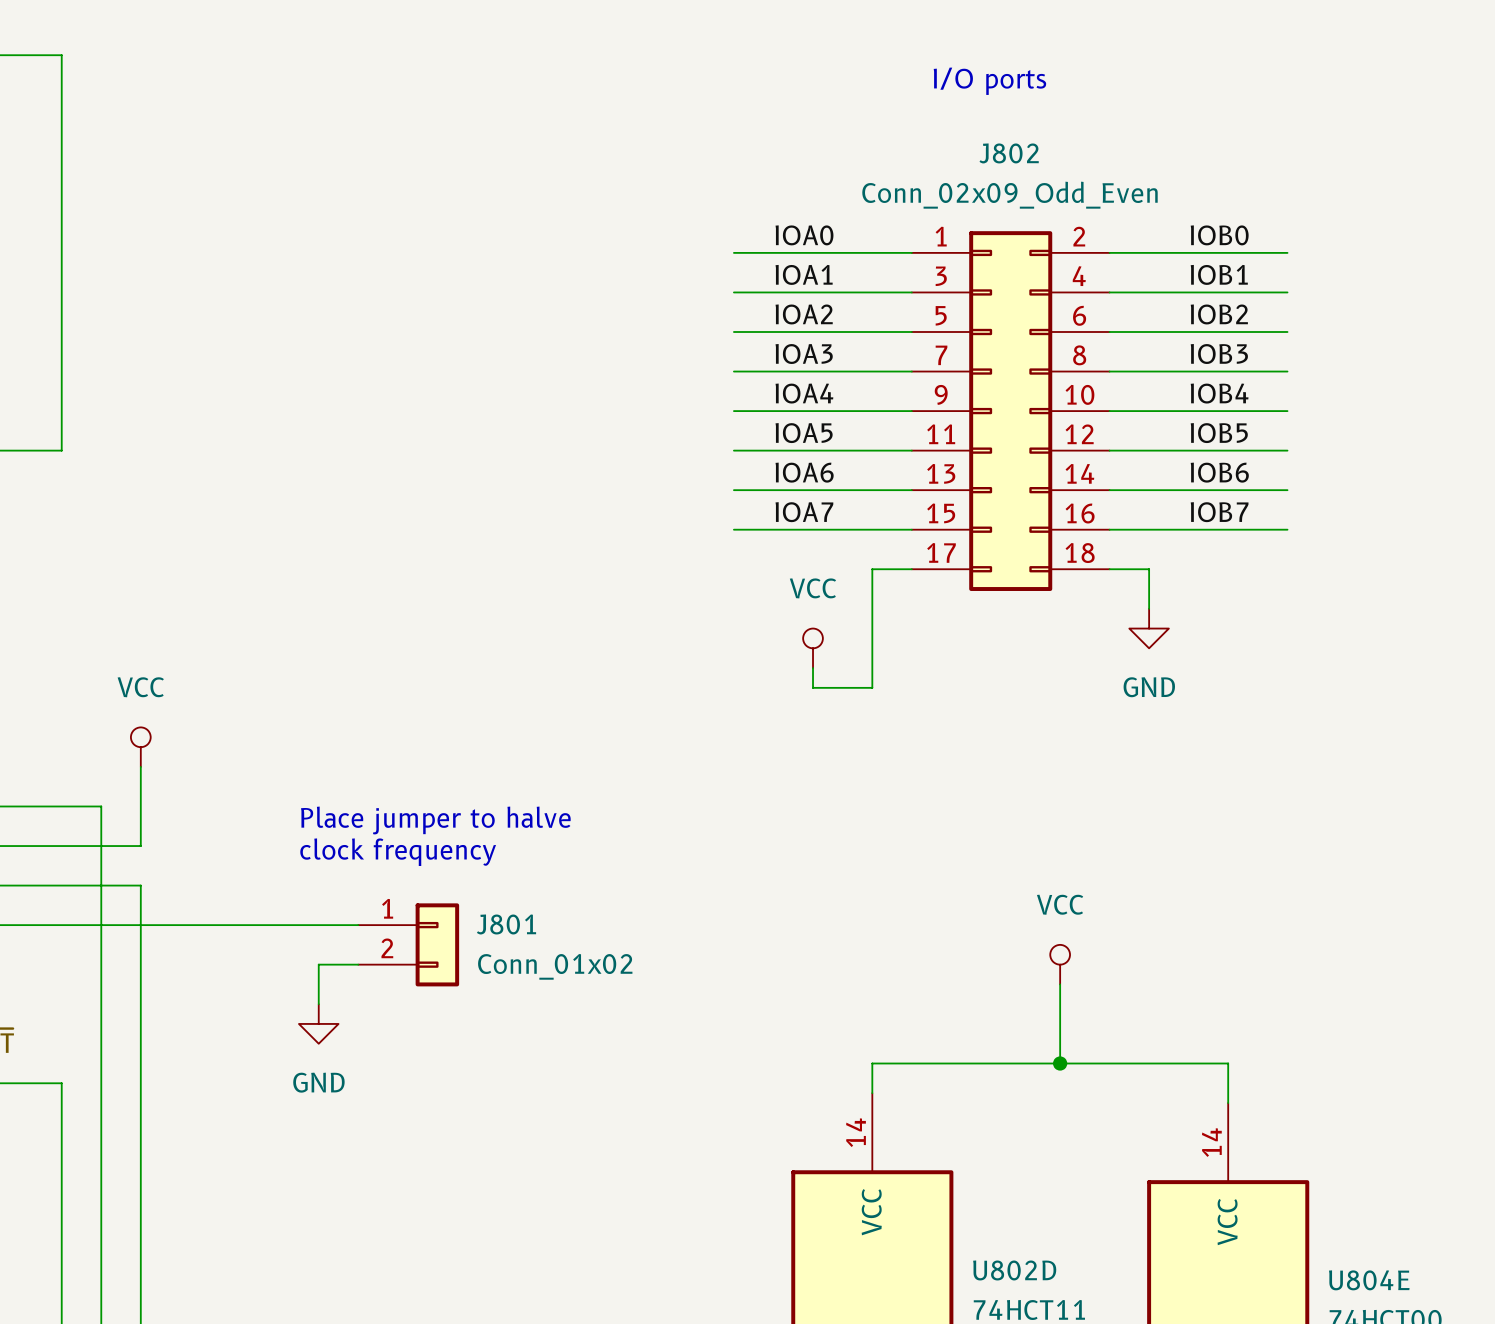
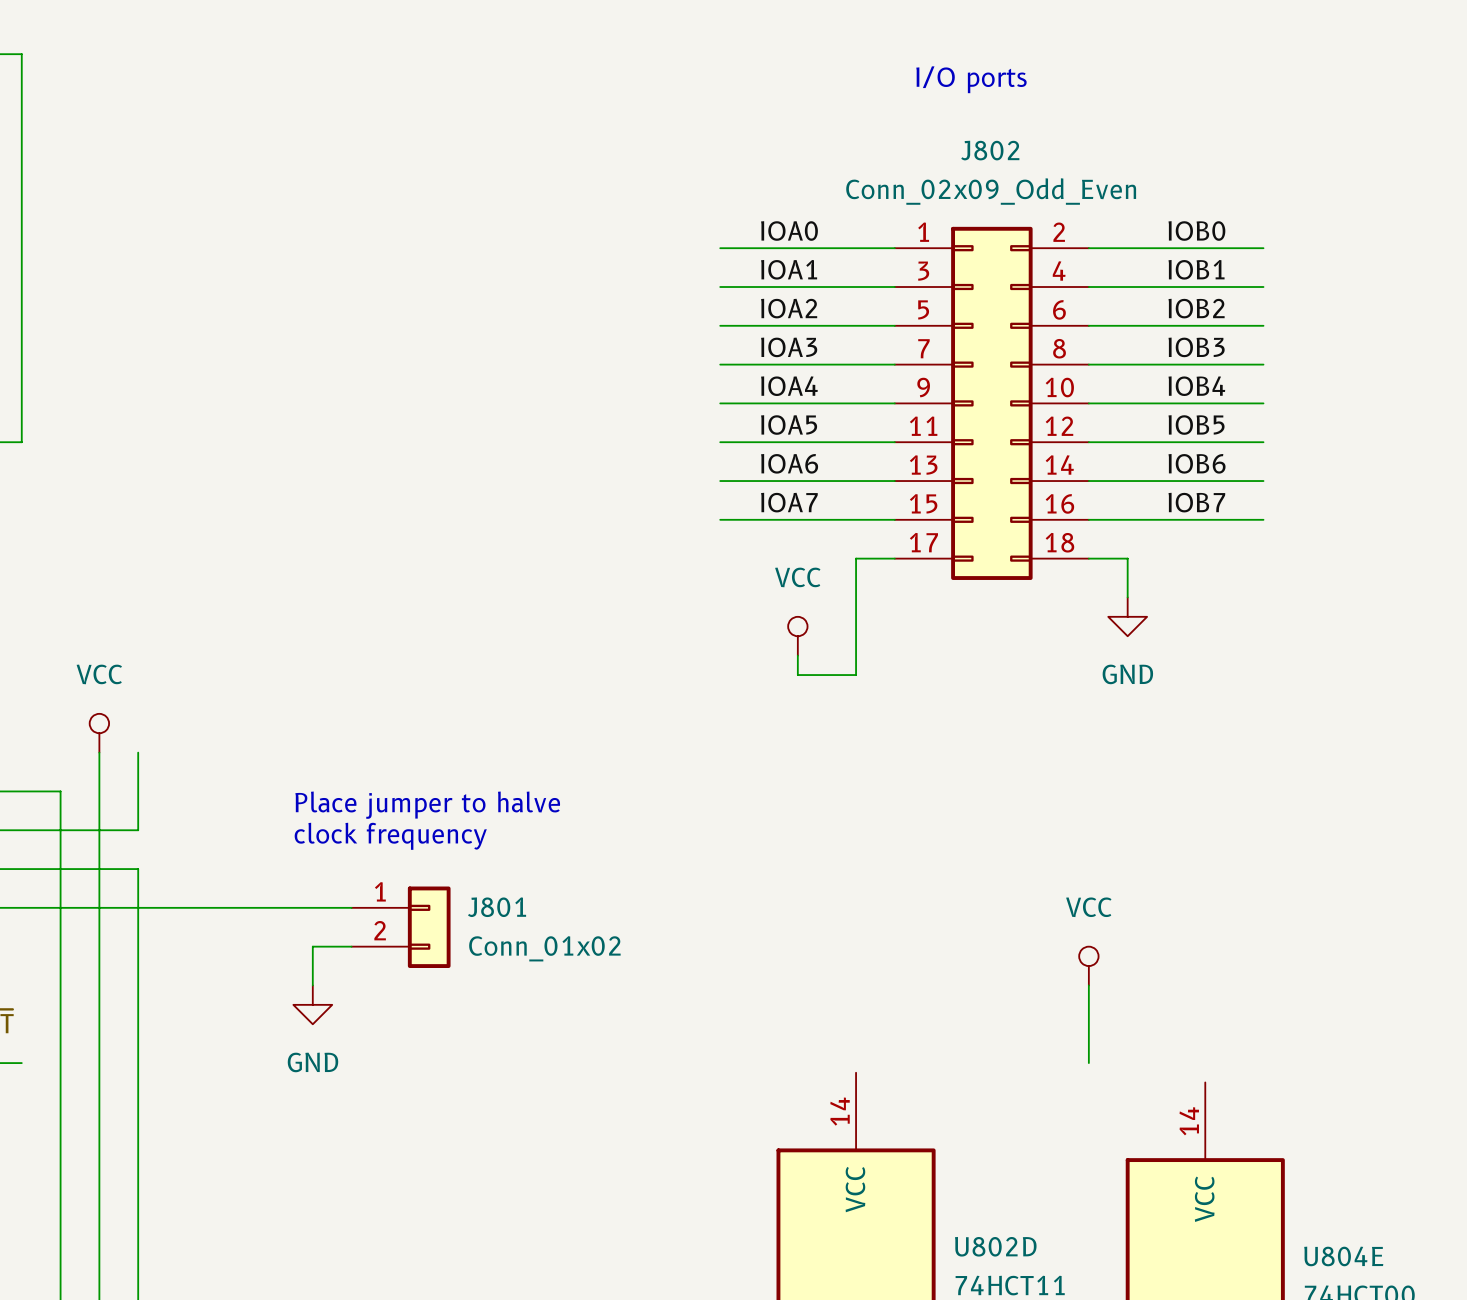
wire: (22, 55) (61, 55) (61, 450) (22, 450) -> (21, 54) (21, 442)
power symbol position: VCC (140, 747) -> VCC (99, 733)
wire: (61, 806) (101, 806) -> (99, 752) (99, 791)
power symbol position: VCC (1060, 964) -> VCC (1088, 966)
wire: (1060, 984) (1060, 1063) -> (1088, 985) (1088, 1063)
junction: (1060, 1063) -> none
wire: (22, 1083) (61, 1083) -> (60, 791) (60, 1063)
wire: (872, 1093) (872, 1063) (1228, 1063) (1228, 1103) -> none

